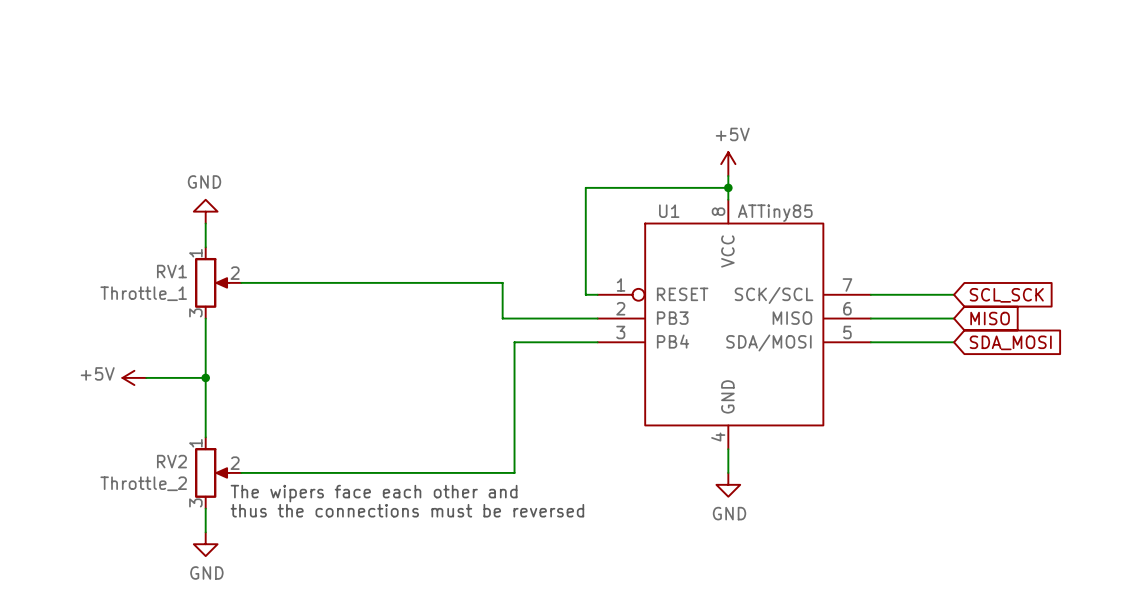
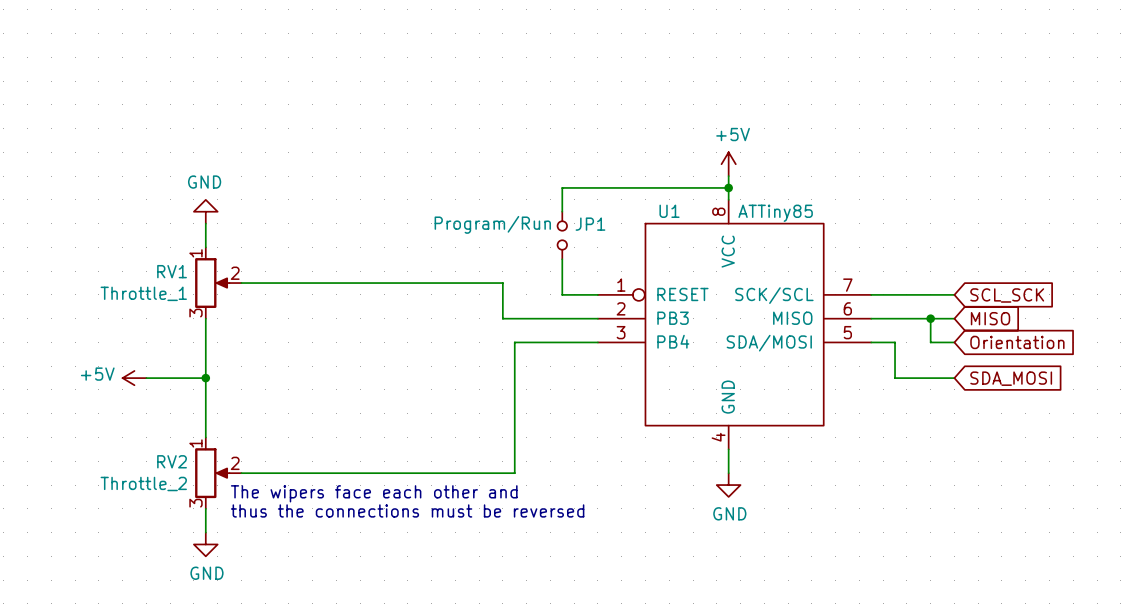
wire: (585, 187) (585, 294) -> (562, 259) (562, 294) (586, 294)
wire: none -> (586, 187) (562, 187) (562, 211)
JP1: none -> Program/Run (562, 235)
junction: none -> (930, 318)
wire: (894, 342) (930, 342) -> (930, 318) (930, 342)
wire: none -> (895, 342) (895, 378) (954, 378)
global label: SDA_MOSI (1010, 342) -> Orientation (1017, 342)
global label: none -> SDA_MOSI (1011, 378)

